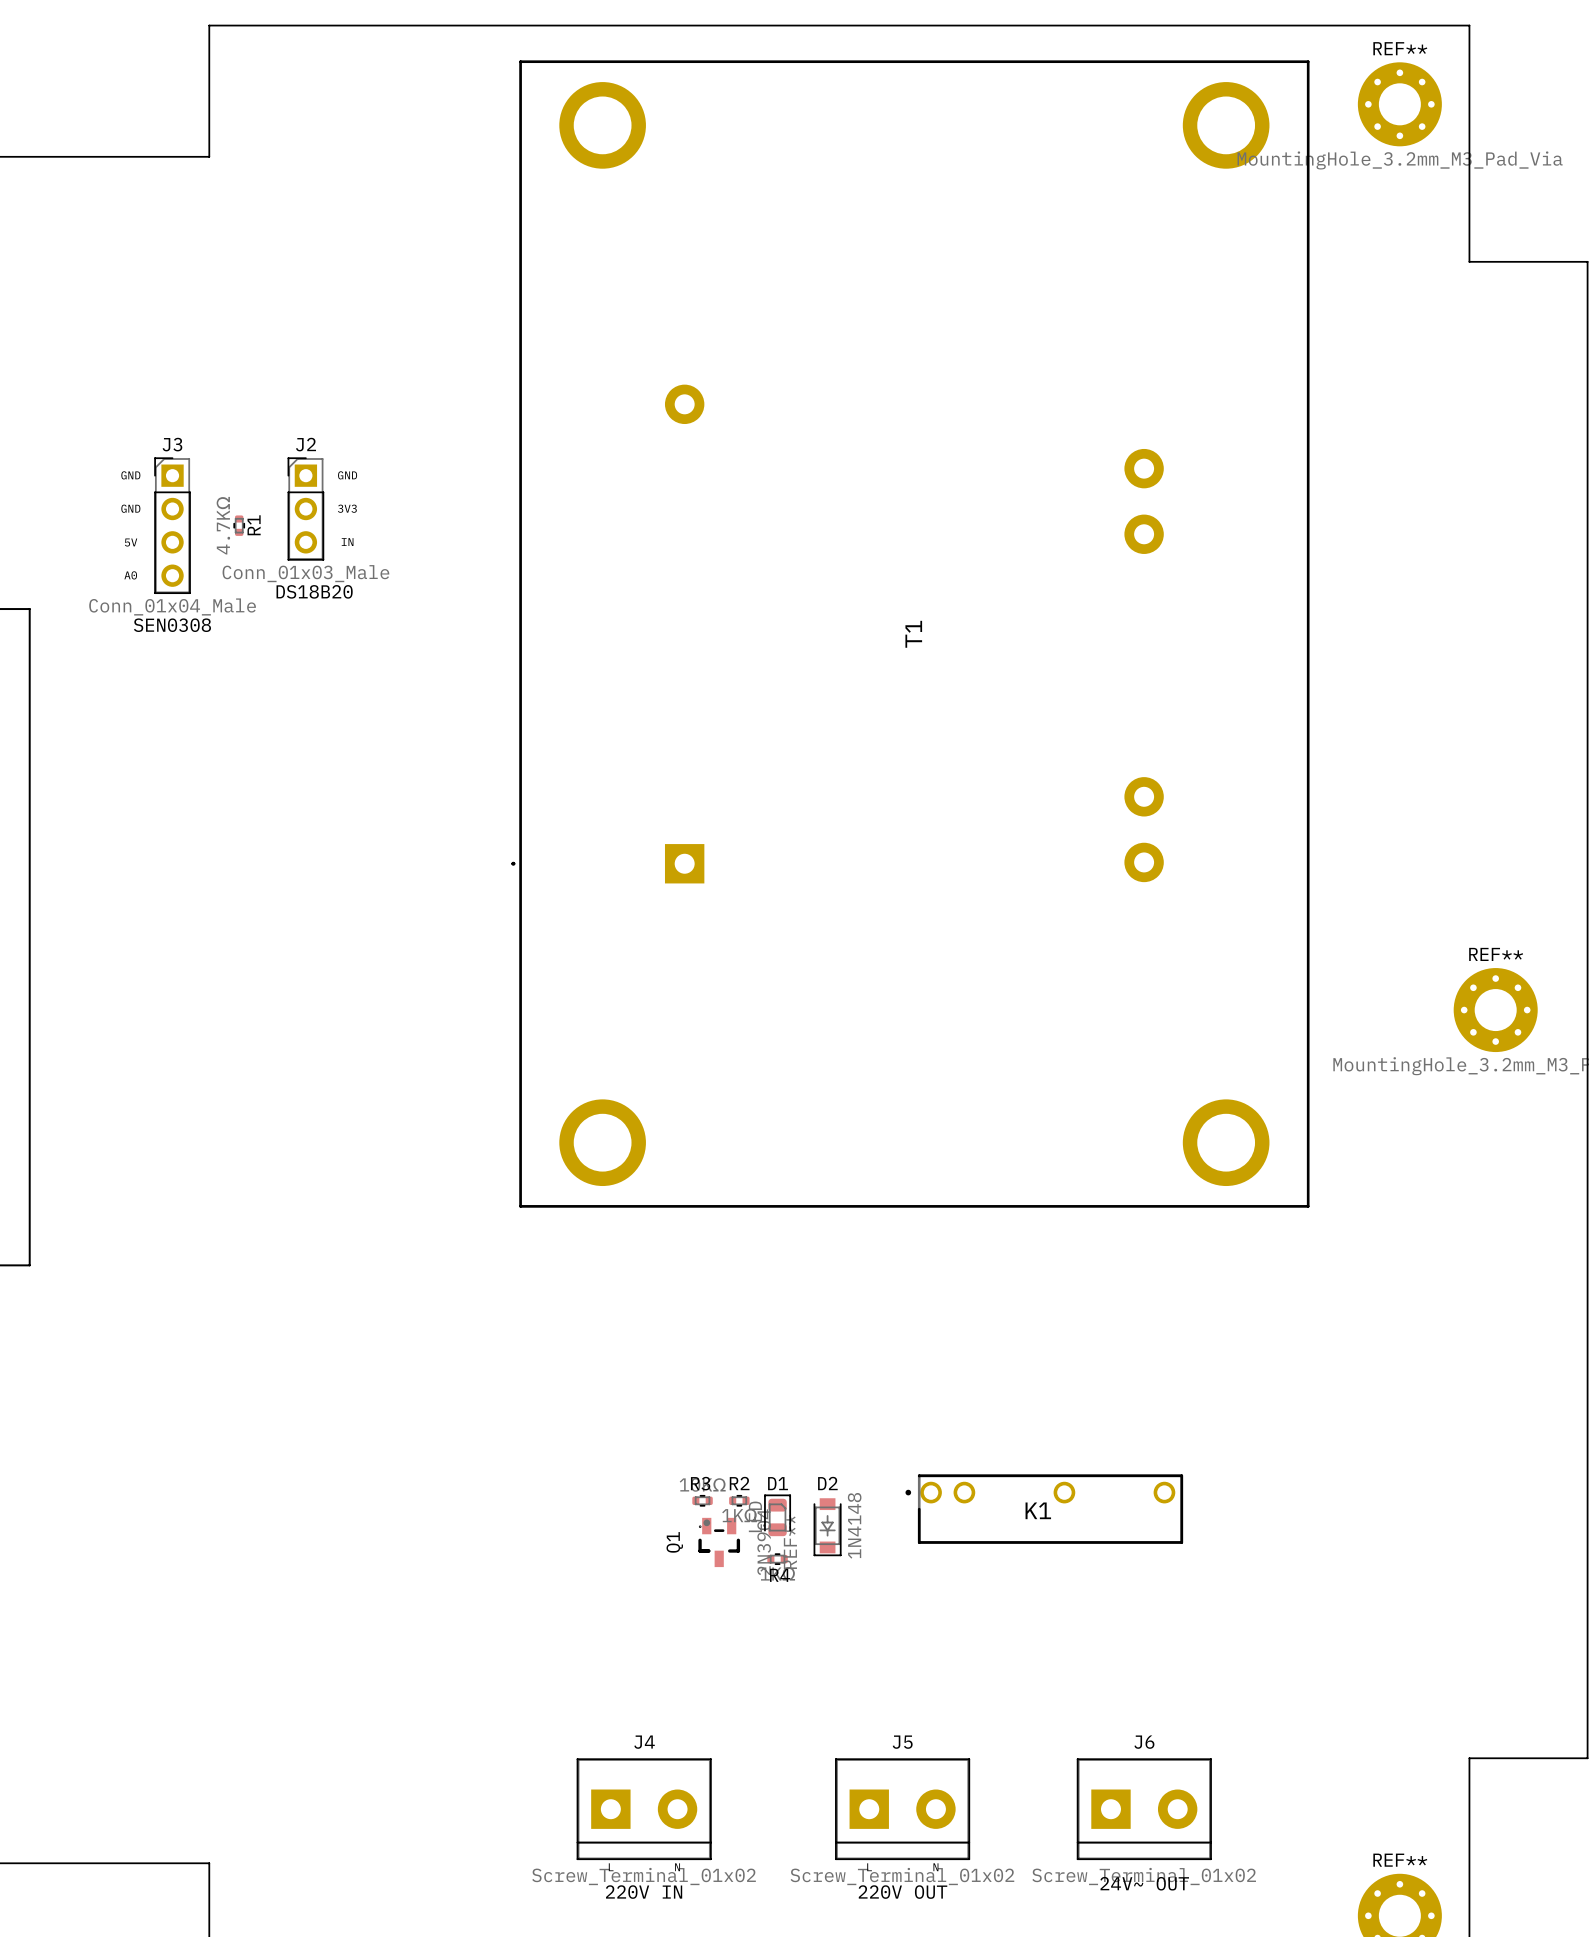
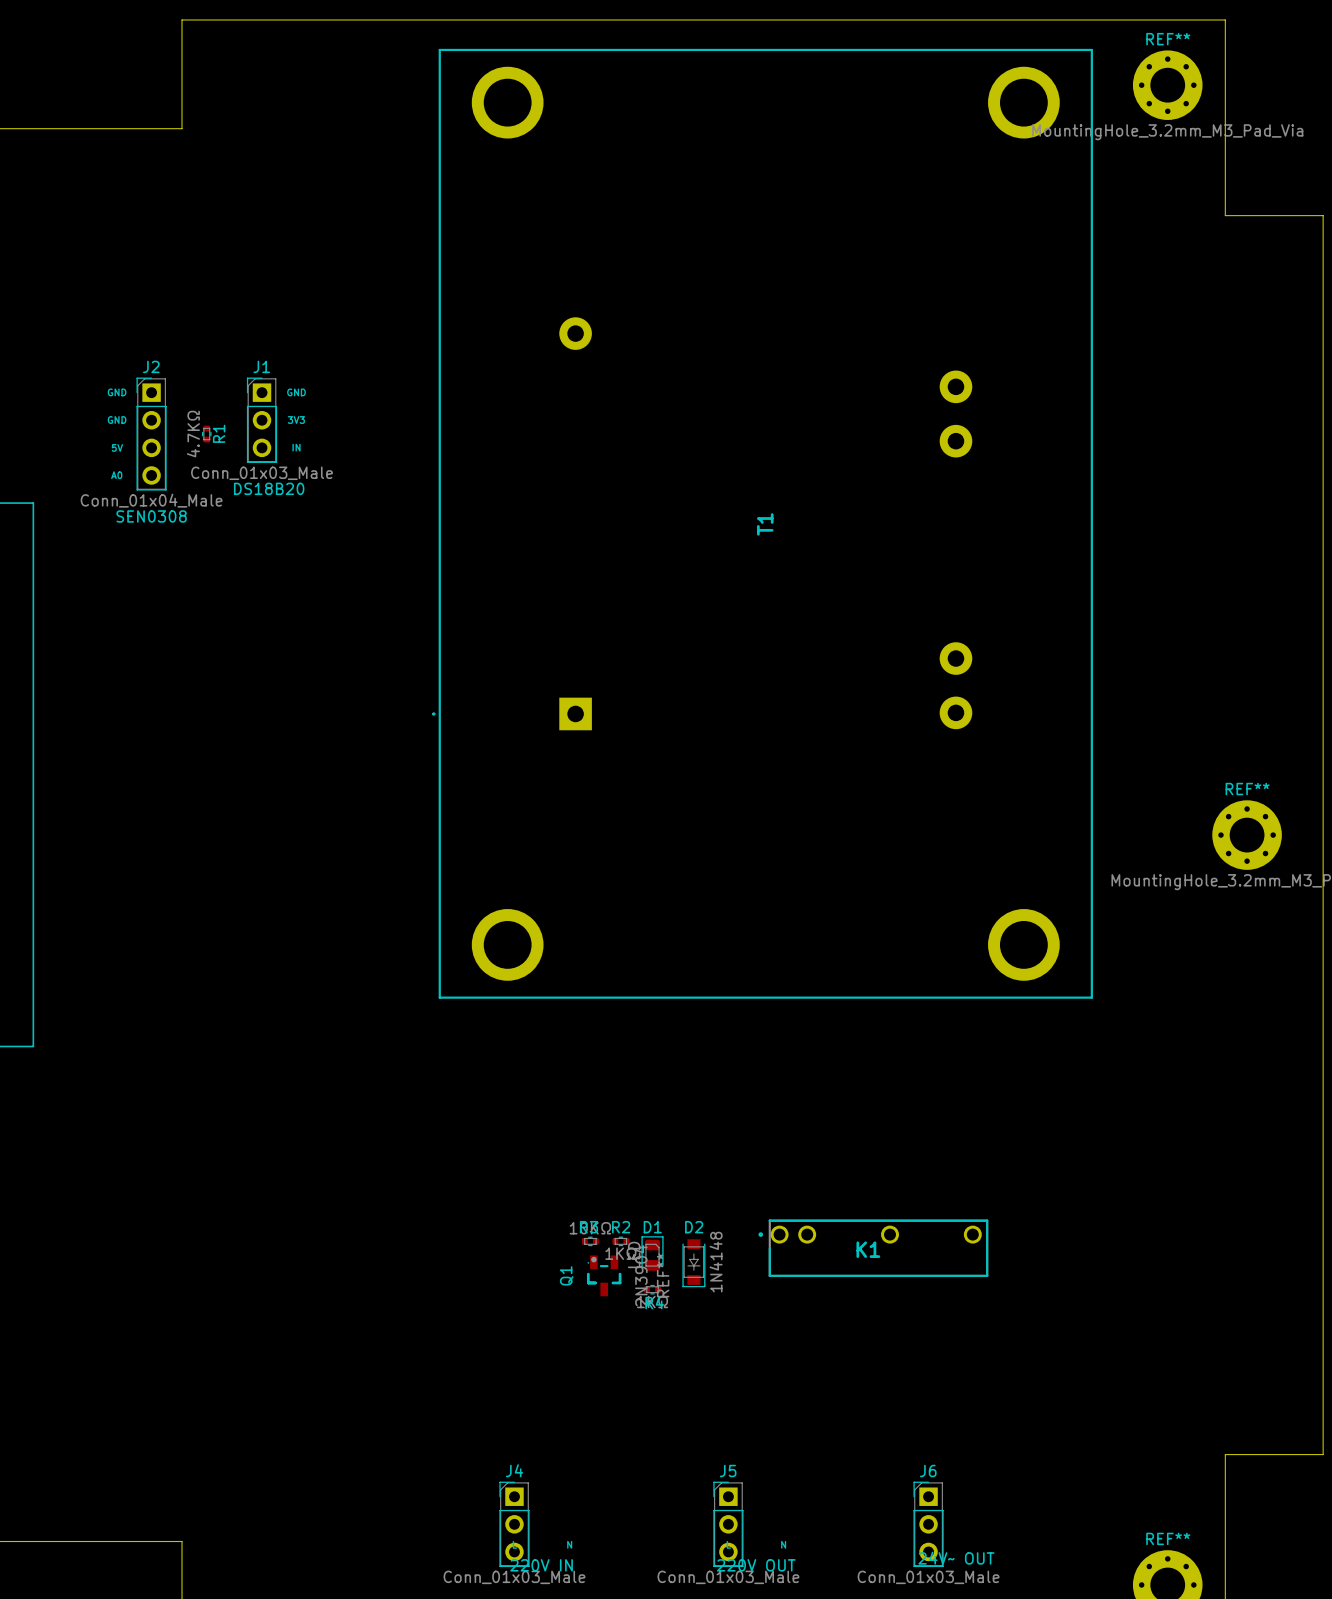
J3 name: J3 (172, 444) -> J2 (151, 366)
J2 name: J2 (306, 444) -> J1 (261, 366)
J4 footprint: [576, 1758, 712, 1861] -> [499, 1481, 530, 1568]
J5 footprint: [835, 1758, 971, 1861] -> [713, 1481, 744, 1568]
J6 footprint: [1076, 1758, 1212, 1861] -> [913, 1481, 944, 1568]
J4 value: Screw_Terminal_01x02 (644, 1876) -> Conn_01x03_Male (514, 1577)
J5 value: Screw_Terminal_01x02 (902, 1876) -> Conn_01x03_Male (728, 1577)
J6 value: Screw_Terminal_01x02 (1144, 1876) -> Conn_01x03_Male (928, 1577)

